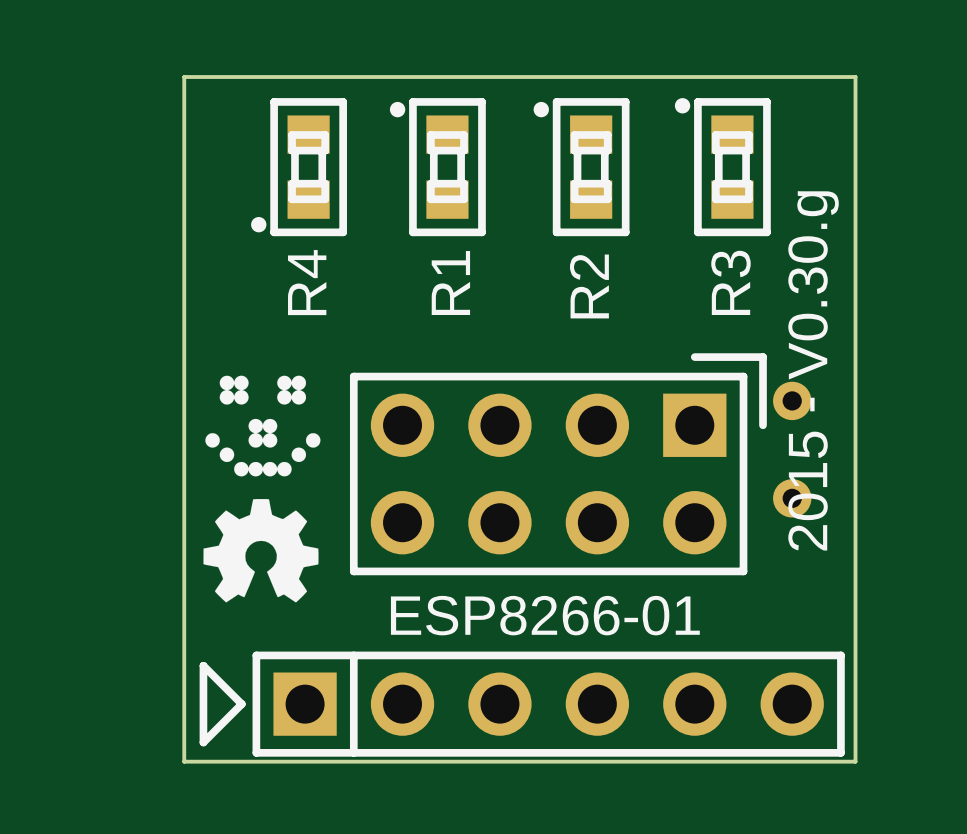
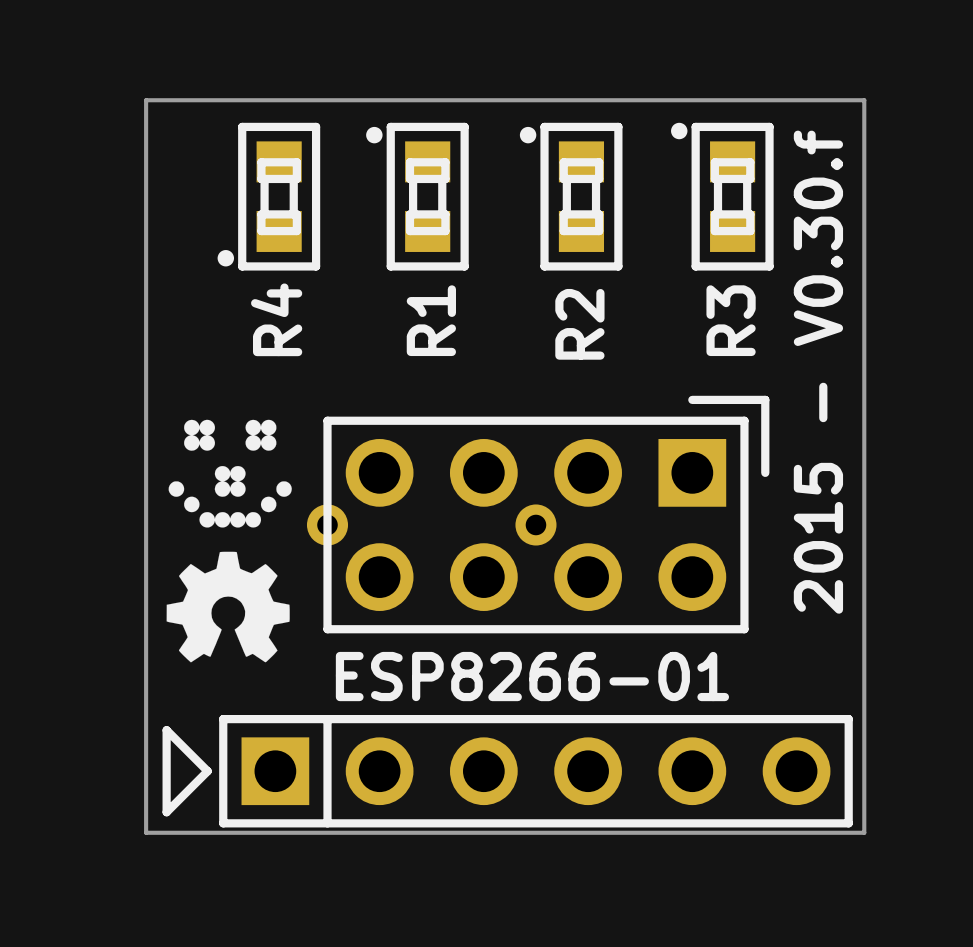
part footprint: [349, 353, 812, 576] -> [306, 395, 770, 634]
text: 2015 - V0.30.g (813, 370) -> 2015 - V0.30.f (818, 372)

